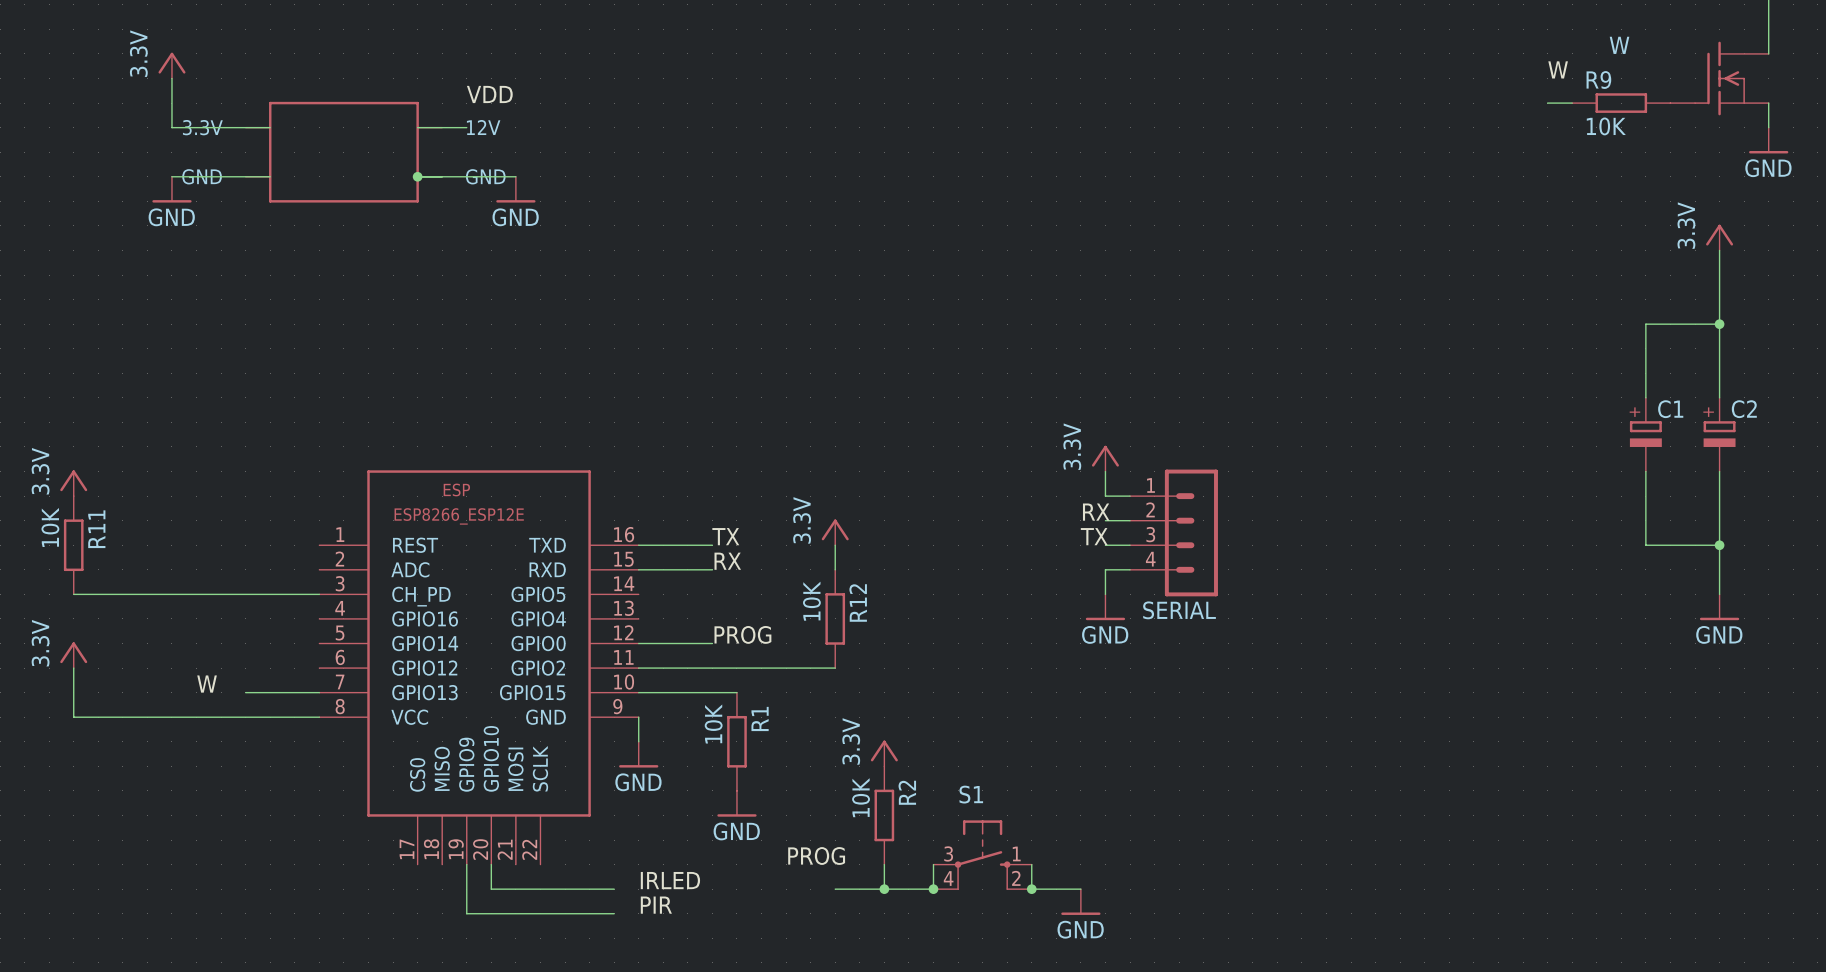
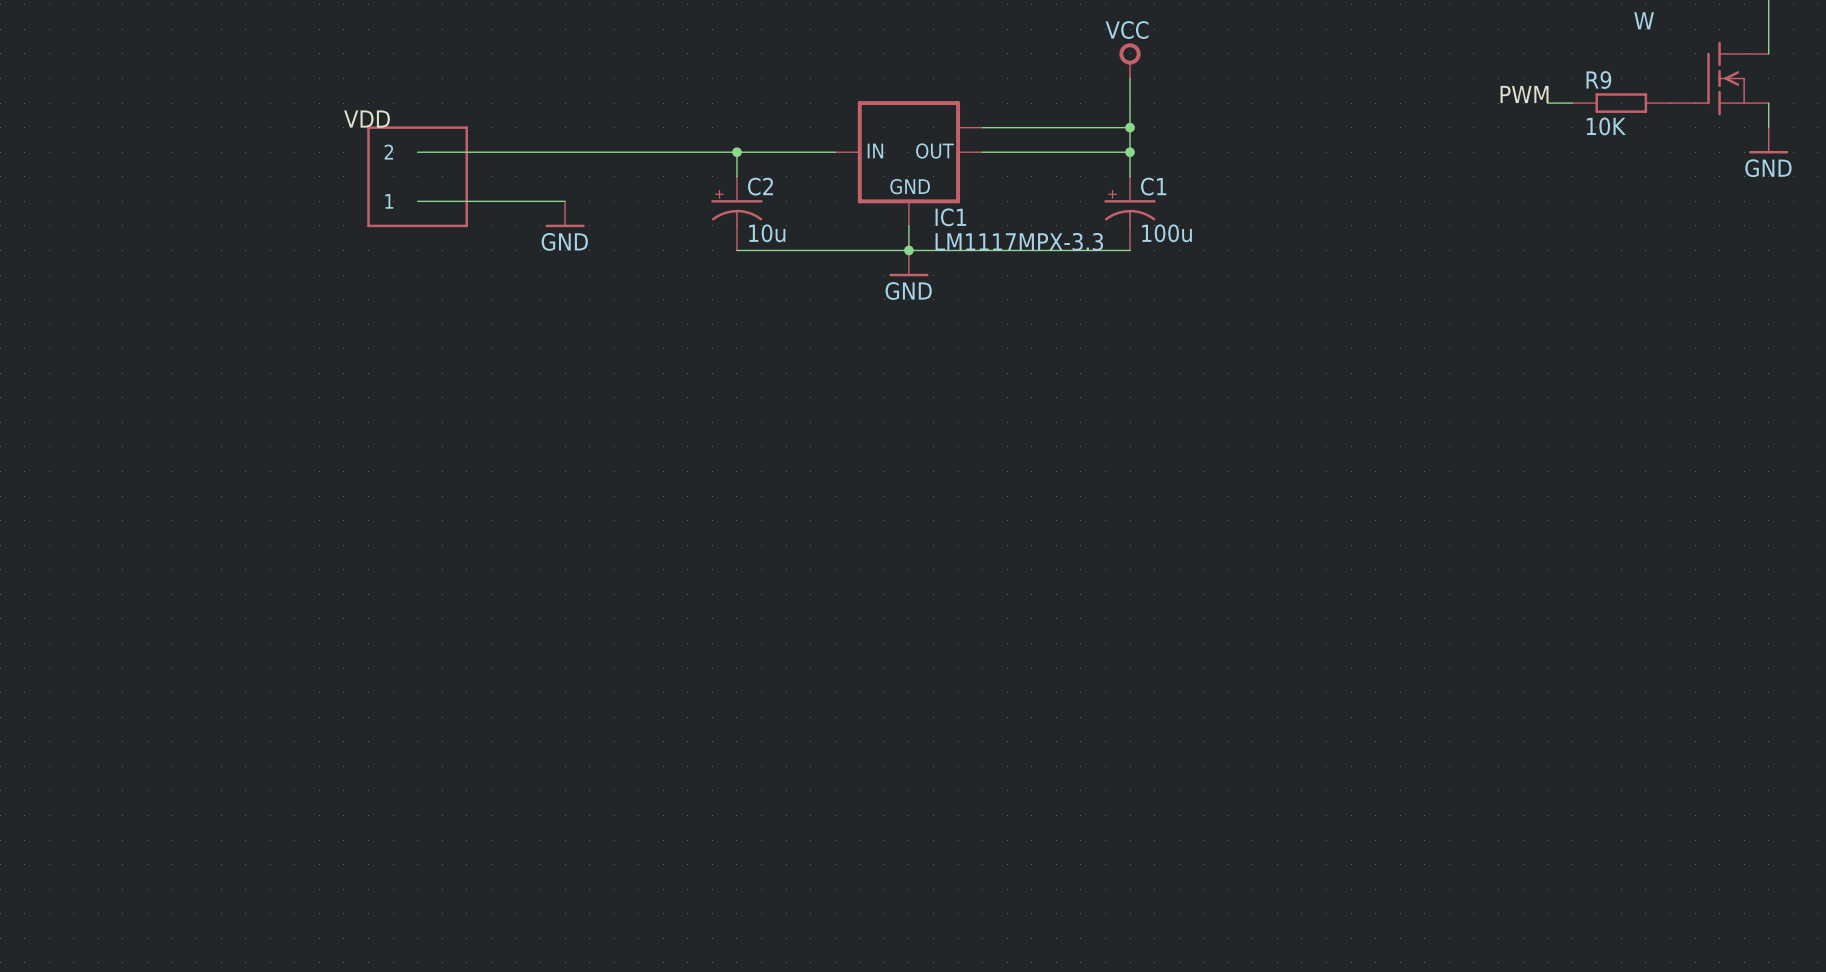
W name position: W (1619, 45) -> W (1644, 20)
power symbol: none -> VCC (1130, 61)
power symbol: 3.3V (171, 65) -> none
label: W (1558, 69) -> none
wire: (171, 78) (171, 127) (270, 127) -> none
wire: none -> (1130, 78) (1130, 176)
label position: VDD (489, 94) -> VDD (367, 119)
label: none -> PWM (1524, 94)
wire: none -> (982, 127) (1130, 127)
junction: none -> (1130, 127)
part: (343, 152) -> none
wire: none -> (417, 152) (835, 152)
wire: none -> (736, 152) (736, 176)
junction: none -> (736, 152)
wire: none -> (982, 152) (1130, 152)
junction: none -> (1130, 152)
IC1: none -> LM1117MPX-3.3 (908, 163)
wire: (171, 176) (270, 176) -> none
wire: (417, 176) (515, 176) -> none
part: none -> (417, 176)
junction: (417, 176) -> none
power symbol: GND (171, 189) -> none
power symbol position: GND (515, 189) -> GND (565, 214)
wire: none -> (417, 201) (565, 201)
wire: none -> (908, 225) (908, 250)
C2 value: none -> 10u (767, 233)
C1 value: none -> 100u (1167, 233)
power symbol: 3.3V (1719, 237) -> none
wire: none -> (736, 250) (1130, 250)
junction: none -> (908, 250)
wire: (1719, 250) (1719, 397) -> none
power symbol: none -> GND (908, 263)
wire: (1719, 324) (1645, 324) (1645, 397) -> none
junction: (1719, 324) -> none
C1 symbol: [1629, 397, 1662, 472] -> [1104, 176, 1156, 251]
C2 symbol: [1703, 397, 1736, 472] -> [711, 176, 763, 251]
power symbol: 3.3V (1105, 458) -> none
wire: (1105, 471) (1105, 496) (1130, 496) -> none
wire: (1645, 471) (1645, 545) (1719, 545) -> none
wire: (1719, 471) (1719, 594) -> none
power symbol: 3.3V (73, 483) -> none
label: RX (1096, 512) -> none
wire: (1105, 520) (1130, 520) -> none
power symbol: 3.3V (835, 532) -> none
SERIAL: (1173, 532) -> none
label: TX (725, 536) -> none
label: TX (1094, 536) -> none
R11: 10K (73, 545) -> none
wire: (638, 545) (712, 545) -> none
wire: (835, 545) (835, 569) -> none
wire: (1105, 545) (1130, 545) -> none
junction: (1719, 545) -> none
label: RX (727, 561) -> none
wire: (638, 569) (712, 569) -> none
wire: (1130, 569) (1105, 569) (1105, 594) -> none
wire: (73, 594) (319, 594) -> none
power symbol: GND (1105, 607) -> none
power symbol: GND (1719, 607) -> none
R12: 10K (835, 618) -> none
label: PROG (742, 634) -> none
wire: (638, 643) (712, 643) -> none
power symbol: 3.3V (73, 655) -> none
ESP: (479, 667) -> none
wire: (73, 668) (73, 717) (319, 717) -> none
wire: (638, 668) (835, 668) -> none
label: W (207, 684) -> none
wire: (245, 692) (319, 692) -> none
wire: (638, 692) (736, 692) -> none
wire: (638, 717) (638, 741) -> none
R1: 10K (736, 741) -> none
power symbol: 3.3V (884, 753) -> none
power symbol: GND (638, 754) -> none
power symbol: GND (736, 803) -> none
R2: 10K (884, 815) -> none
S1: (982, 855) -> none
label: PROG (816, 856) -> none
wire: (466, 864) (466, 913) (614, 913) -> none
wire: (491, 864) (491, 889) (614, 889) -> none
wire: (884, 864) (884, 889) -> none
wire: (933, 864) (933, 889) (835, 889) -> none
wire: (1031, 864) (1031, 889) (1080, 889) -> none
label: IRLED (670, 880) -> none
junction: (884, 889) -> none
junction: (933, 889) -> none
junction: (1031, 889) -> none
power symbol: GND (1080, 902) -> none
label: PIR (656, 905) -> none

